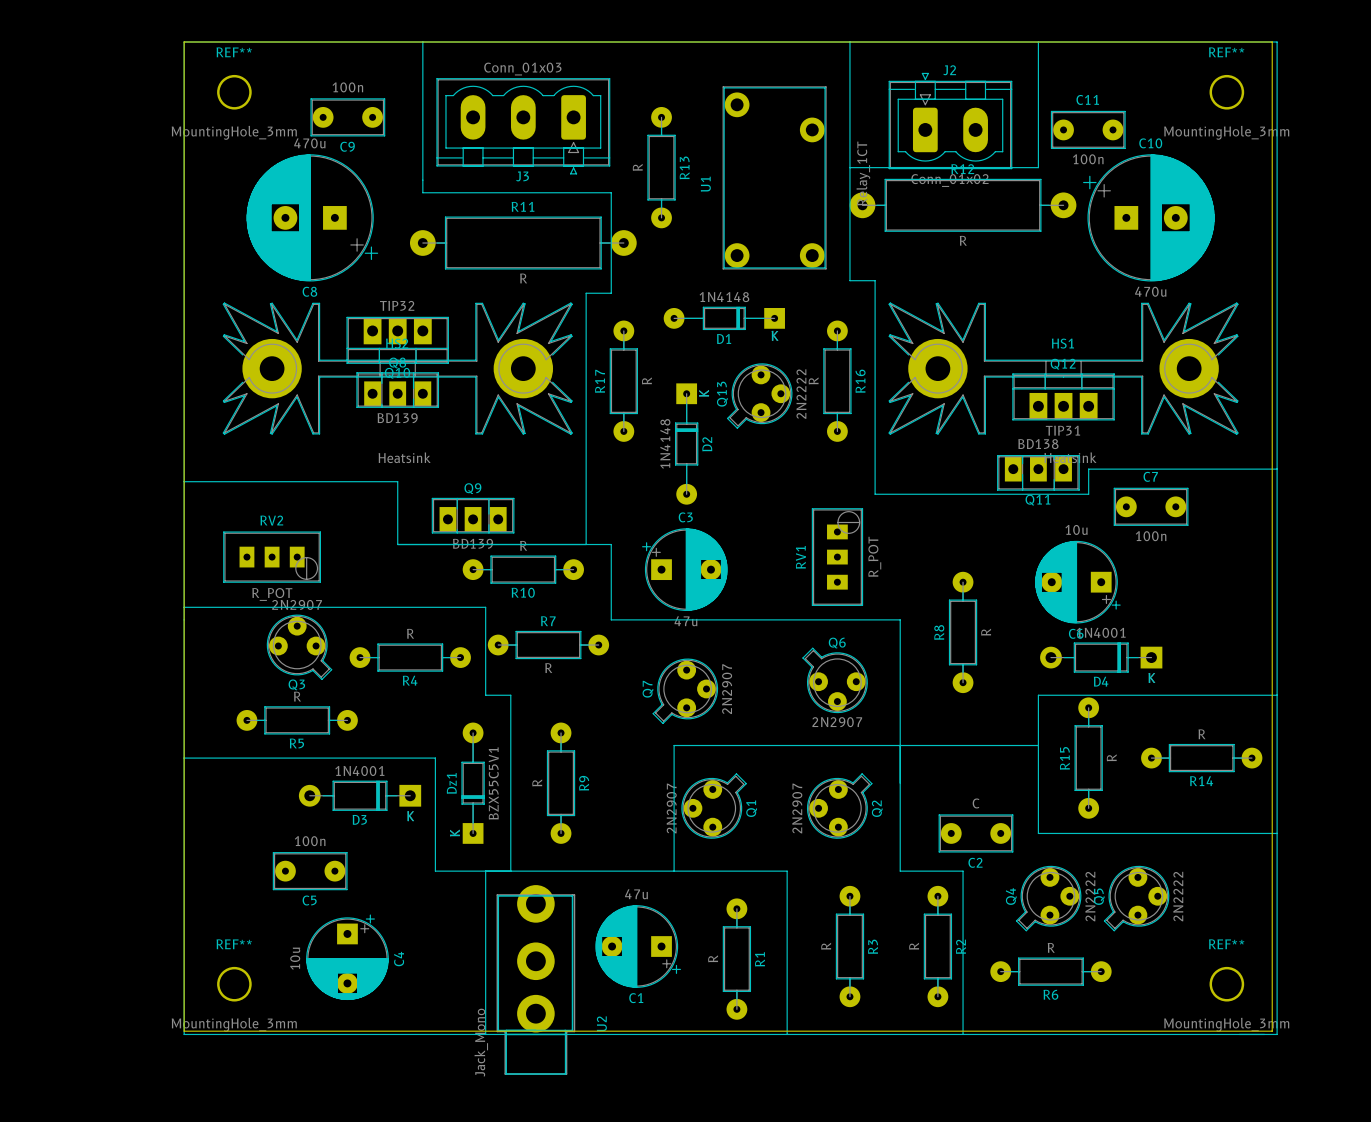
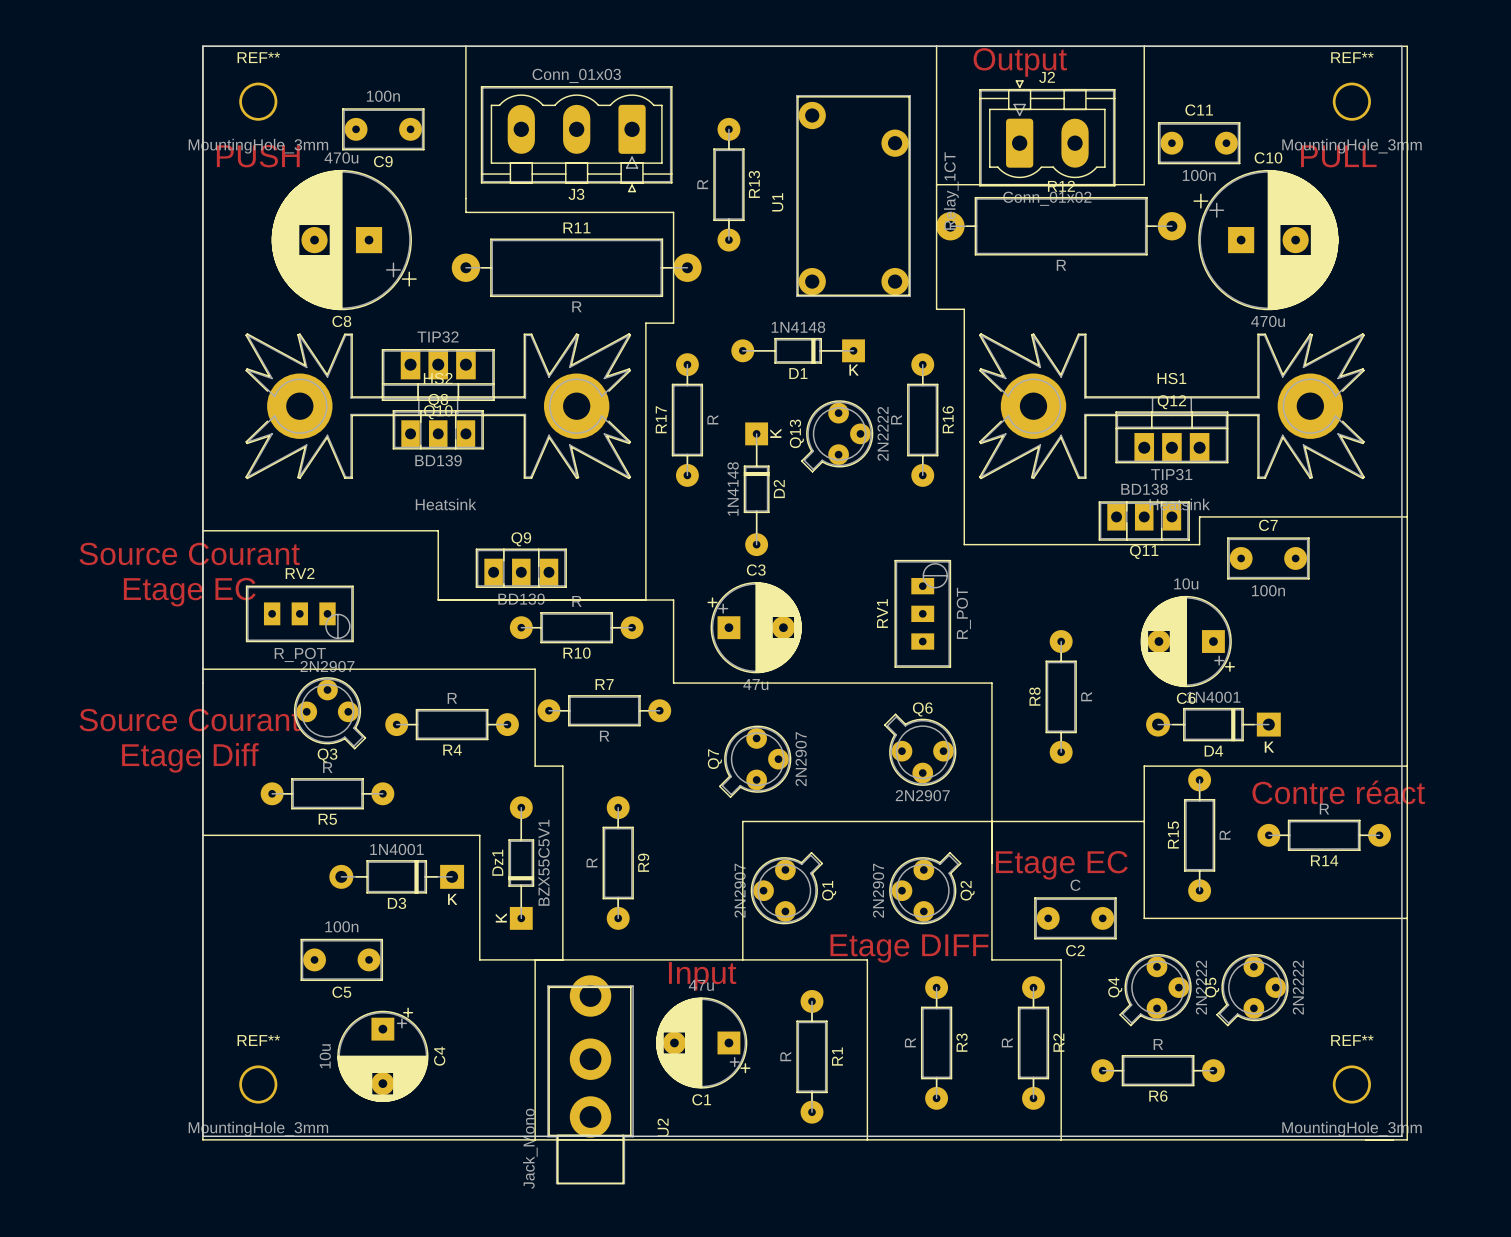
text: none -> Output (1020, 62)
text: none -> PUSH (258, 156)
text: none -> PULL (1338, 156)
text: none -> Source Courant (189, 553)
text: none -> Etage EC (189, 592)
text: none -> Source Courant (189, 720)
text: none -> Etage Diff (190, 757)
text: none -> Contre réact (1338, 792)
text: none -> Etage EC (1061, 865)
text: none -> Etage DIFF (909, 948)
text: none -> Input (702, 976)

